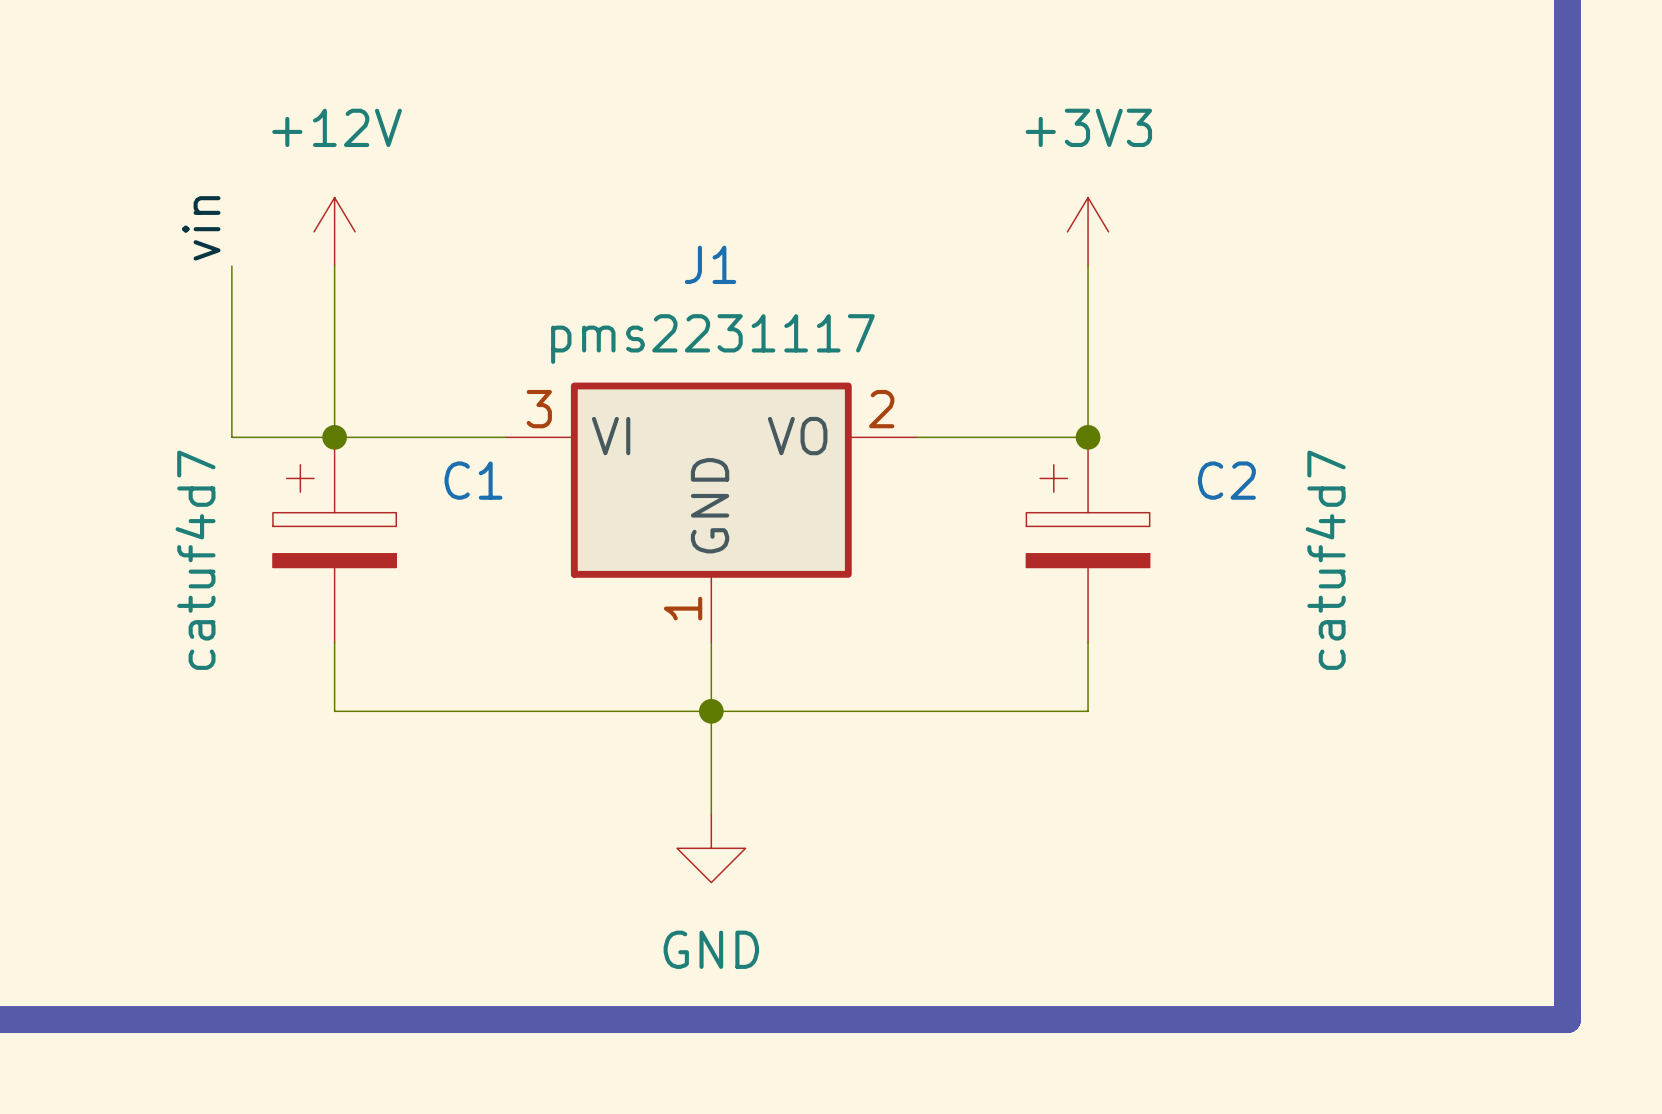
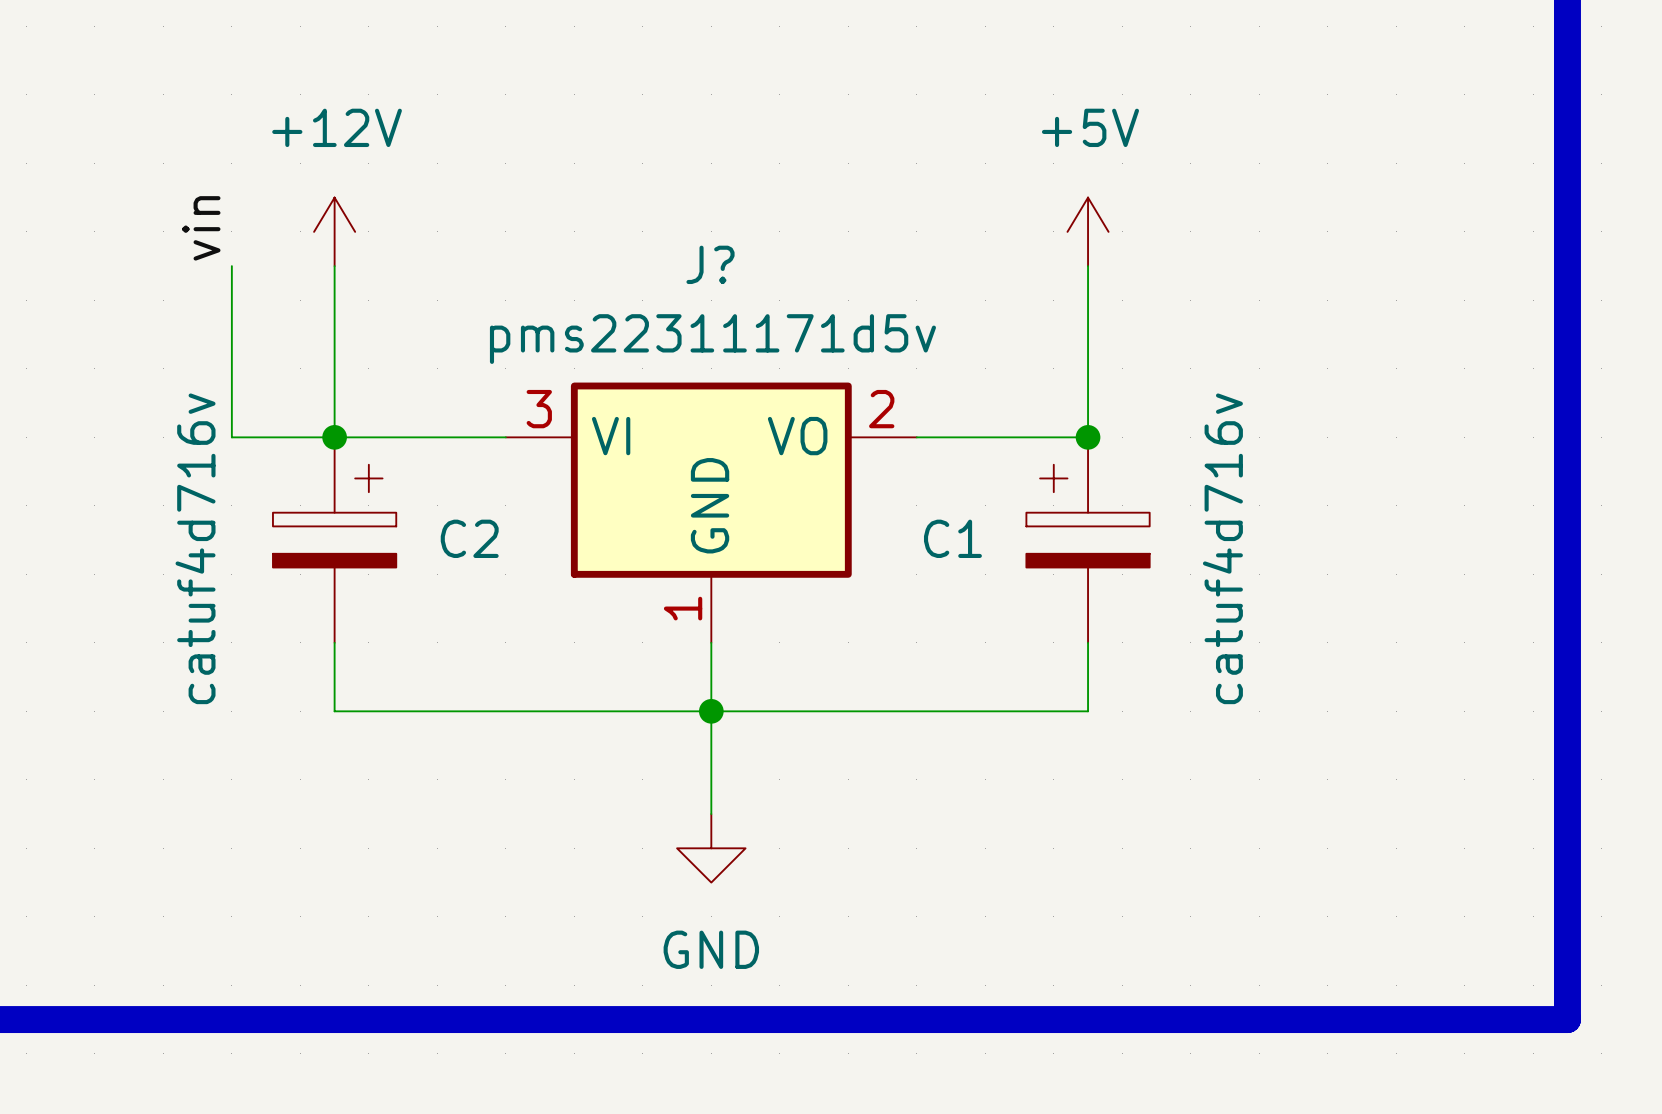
power symbol: +3V3 (1088, 231) -> +5V (1088, 231)
J1 name: J1 (710, 264) -> J? (710, 264)
J1 value: pms2231117 (712, 339) -> pms22311171d5v (712, 339)
C2 name: C2 (1226, 480) -> C1 (952, 538)
C1: catuf4d7 (334, 540) -> none
C2: none -> catuf4d716v (334, 540)
C2 value: catuf4d7 (1325, 560) -> catuf4d716v (1222, 548)

